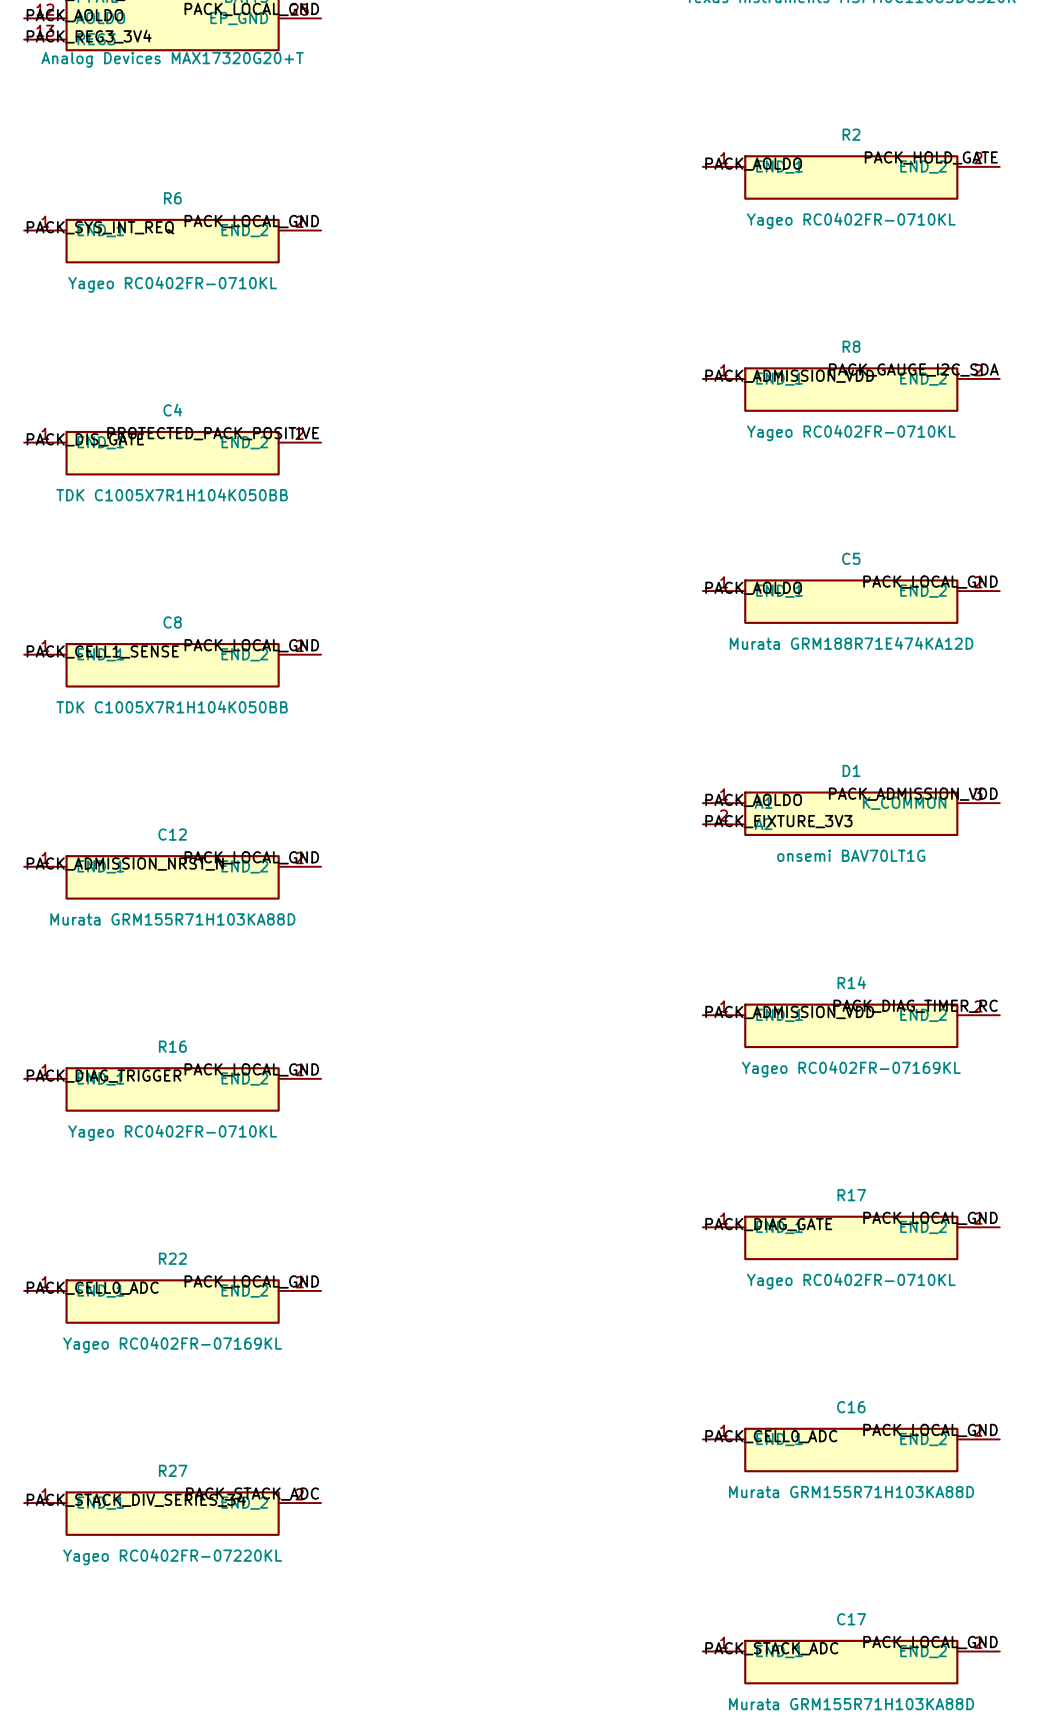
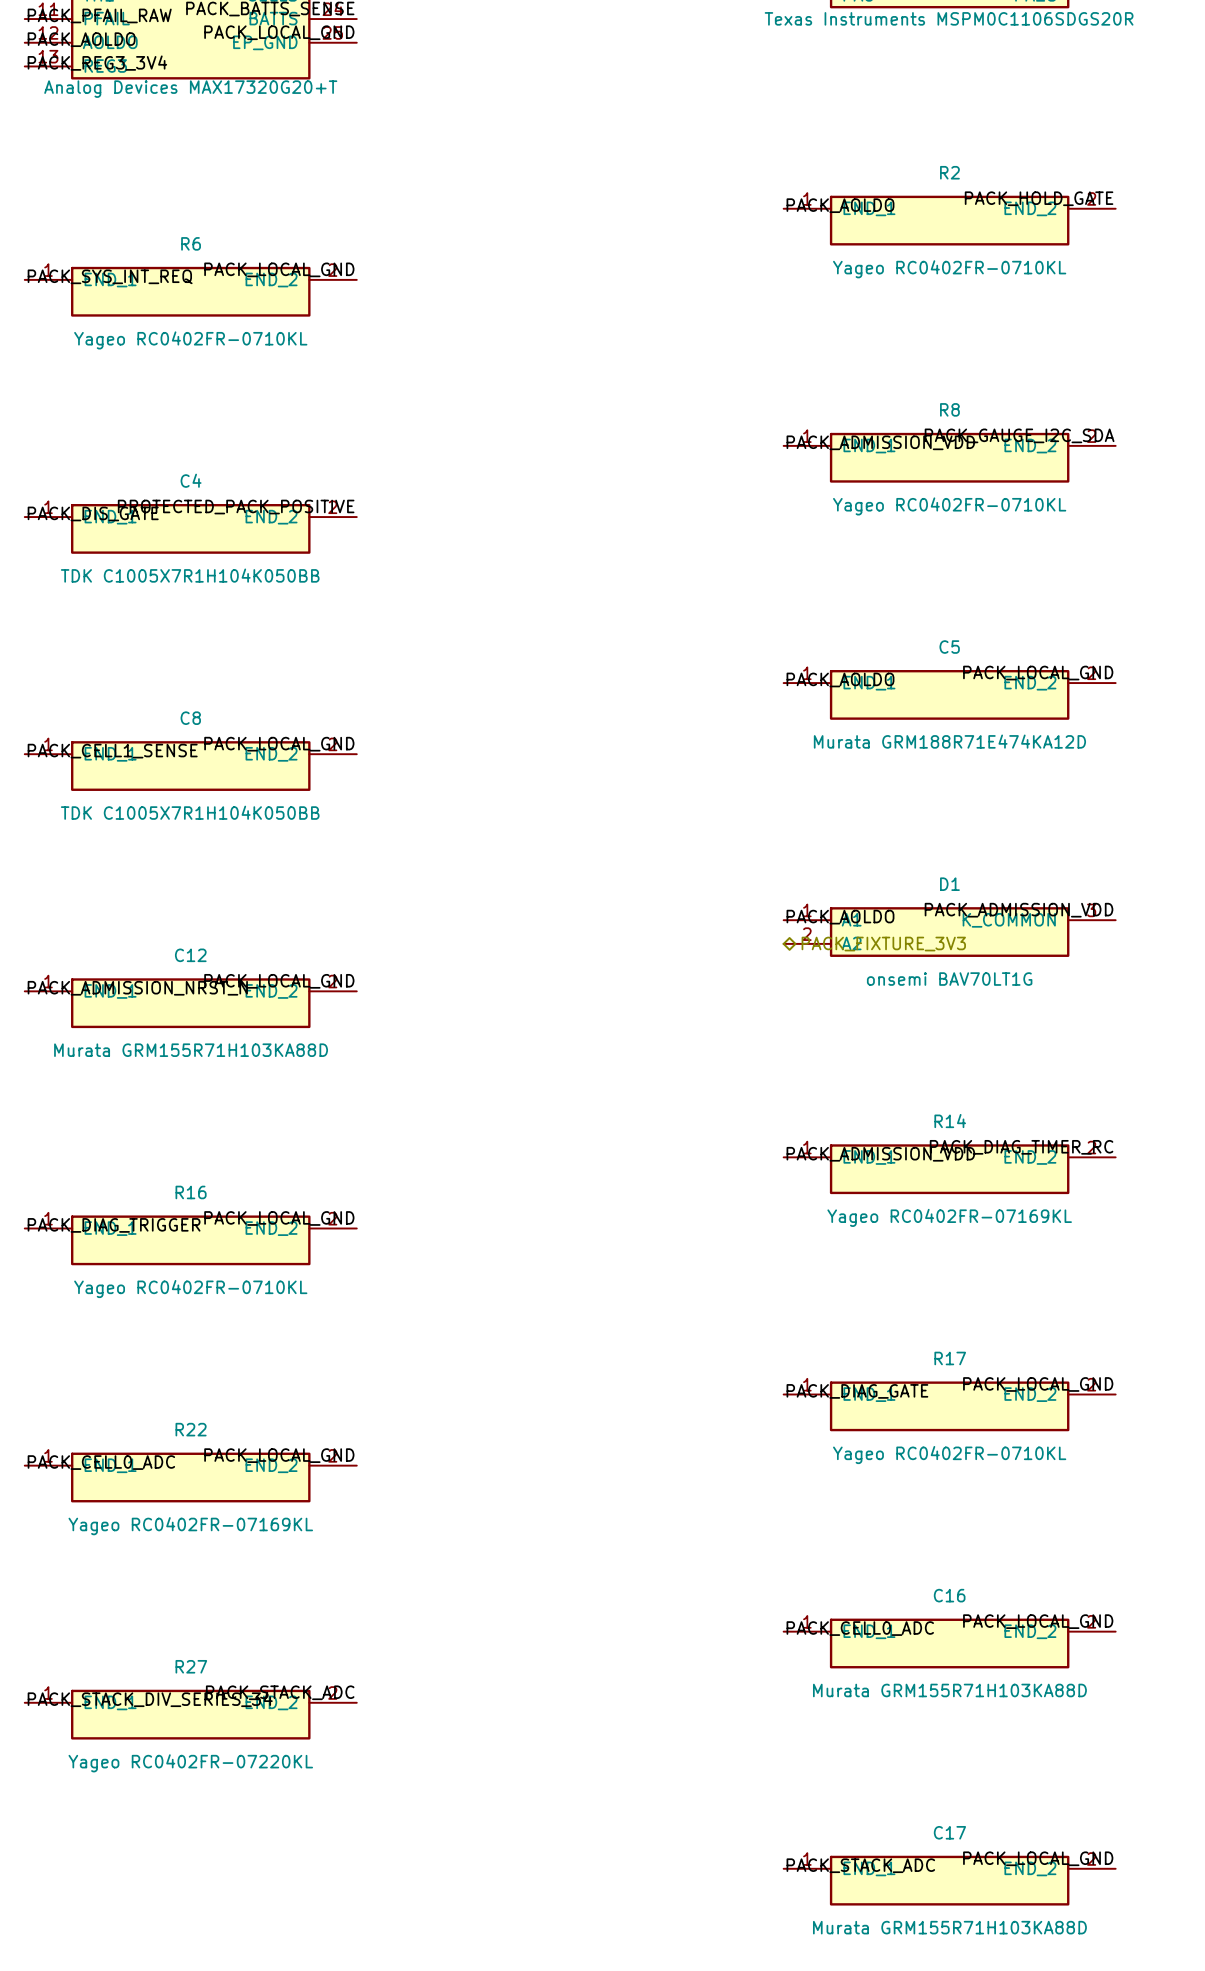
label: PACK_FIXTURE_3V3 (778, 821) -> none
hierarchical label: none -> PACK_FIXTURE_3V3 (883, 944)

